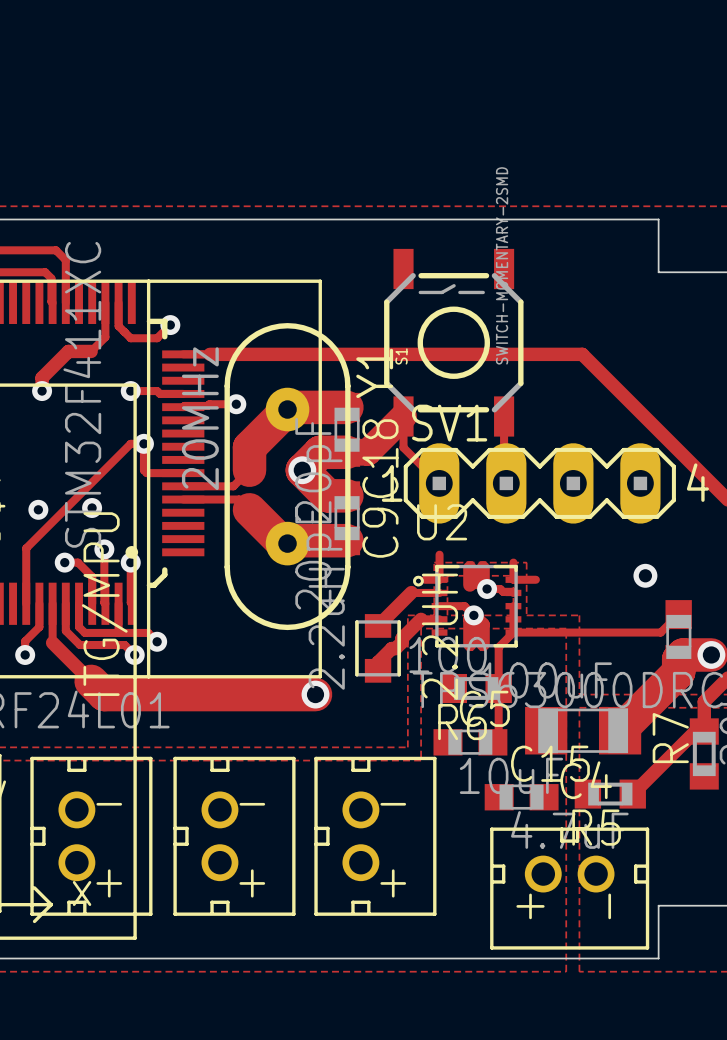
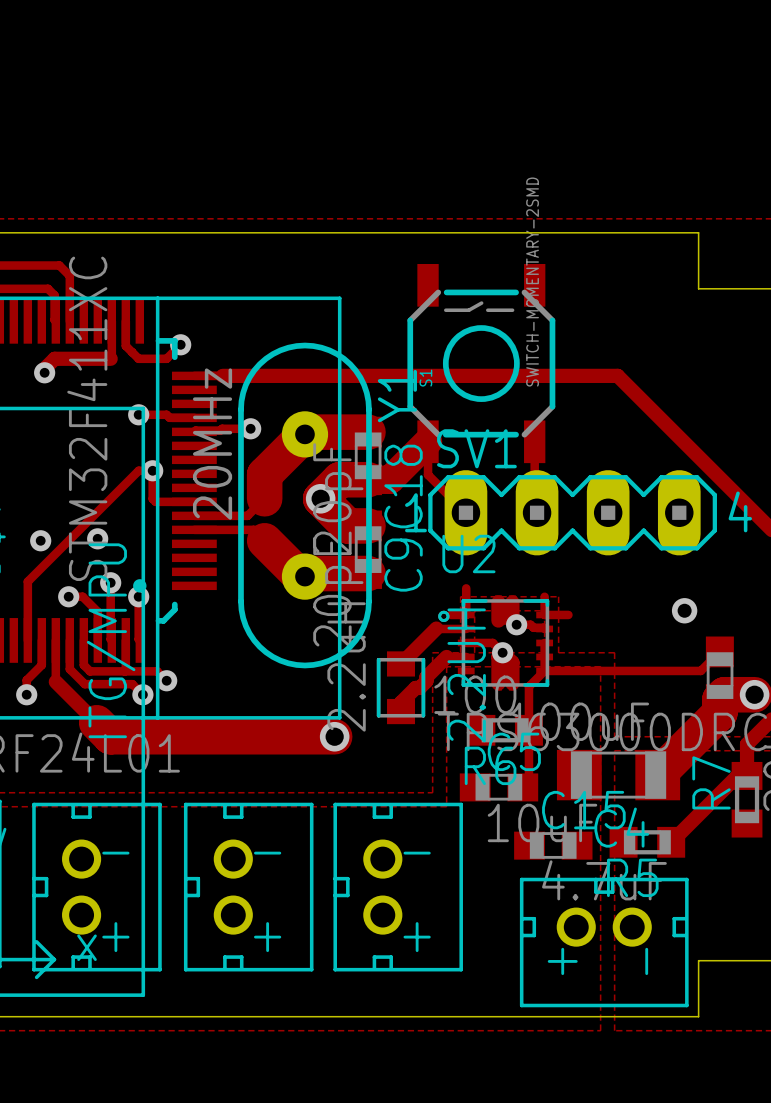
track: (104, 338) (91, 351) (68, 351) (42, 377) (42, 391) -> (110, 358) (54, 358) (44, 368) (44, 372)
via: none -> (44, 372)
via: (42, 391) -> none

